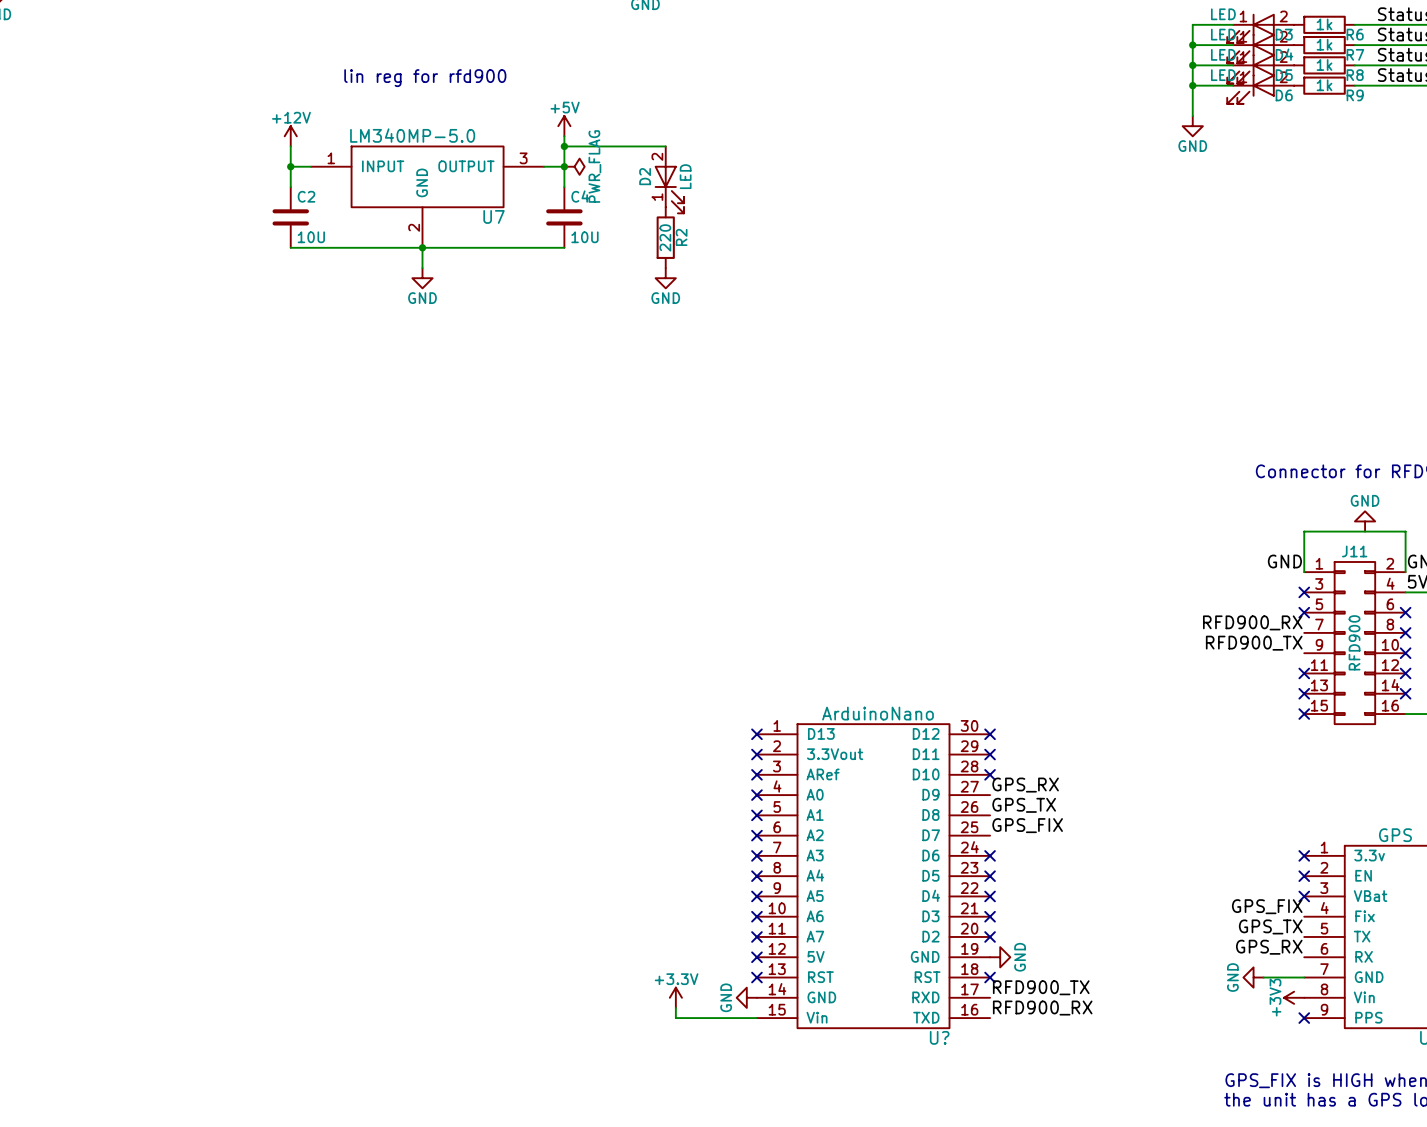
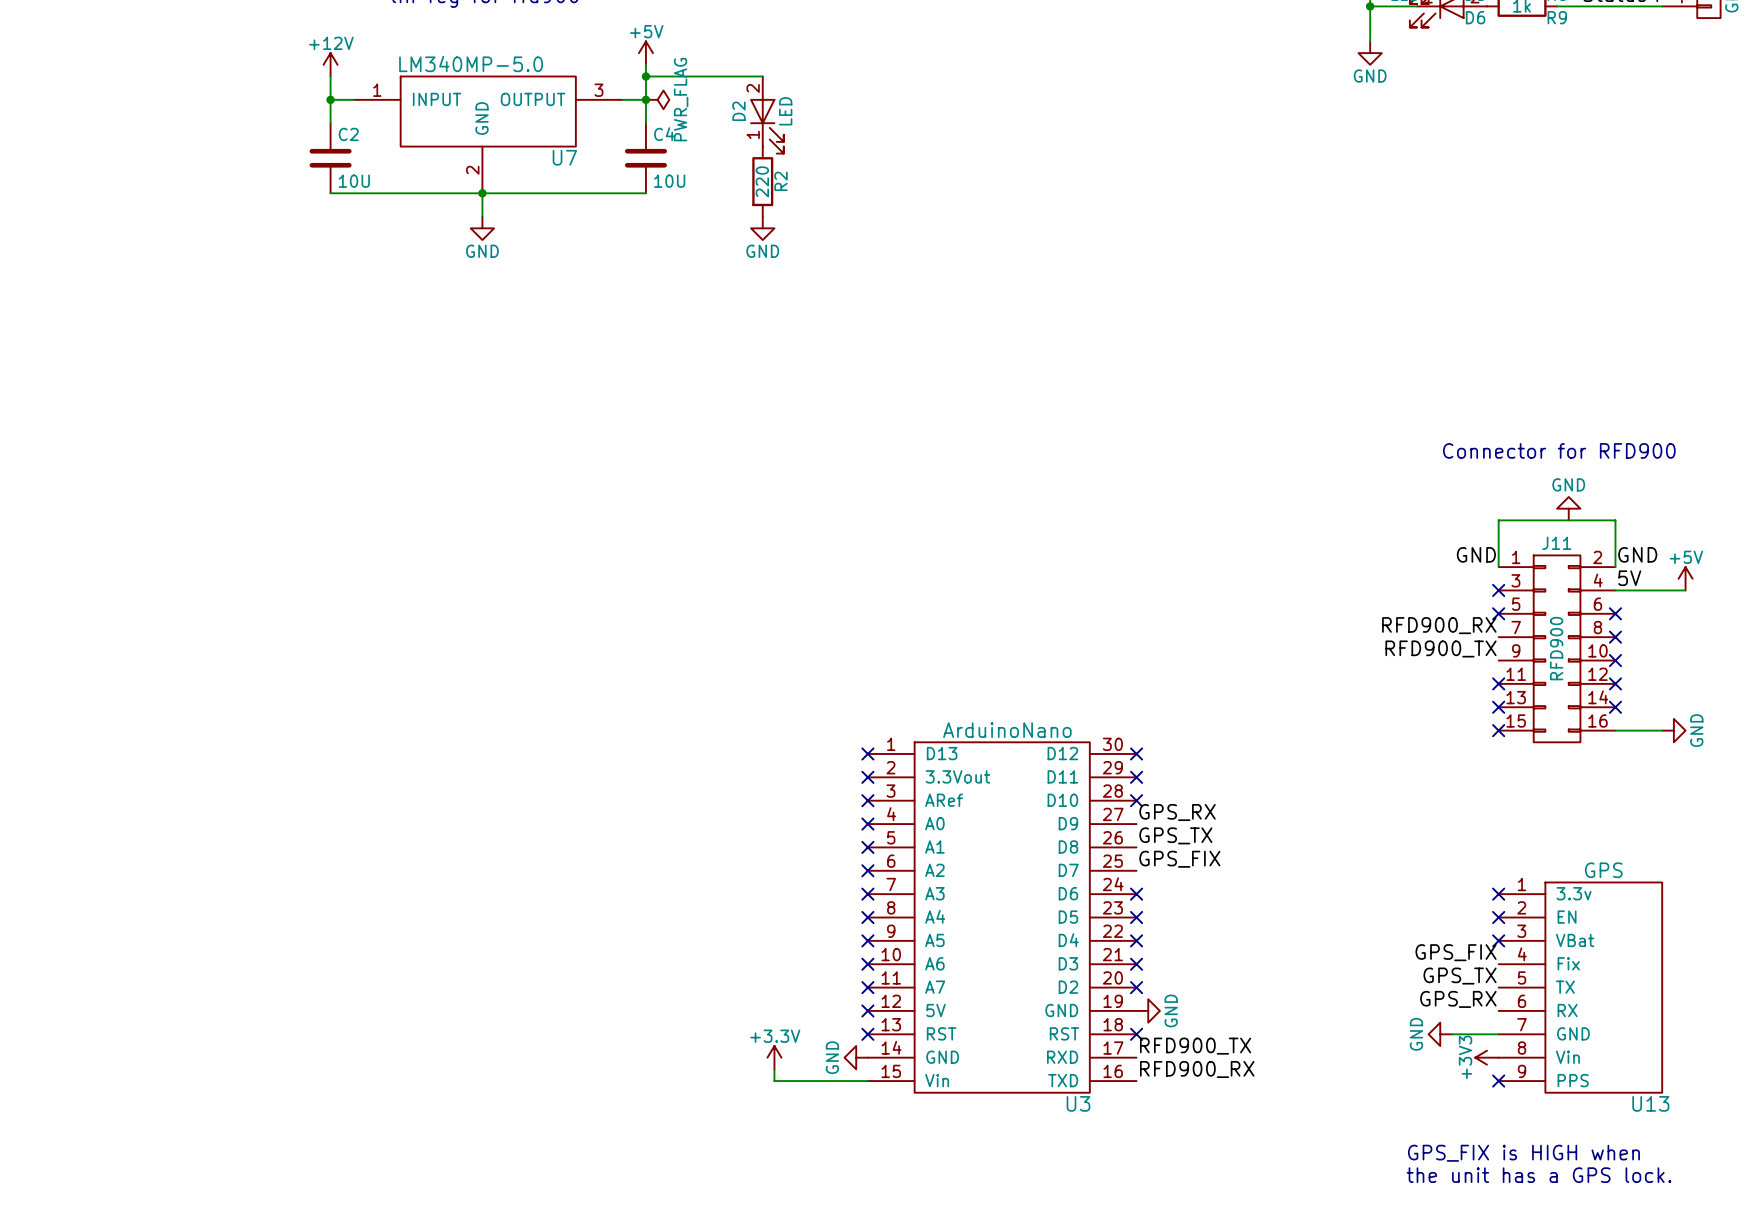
U? name: U? (939, 1037) -> U3 (1078, 1103)

